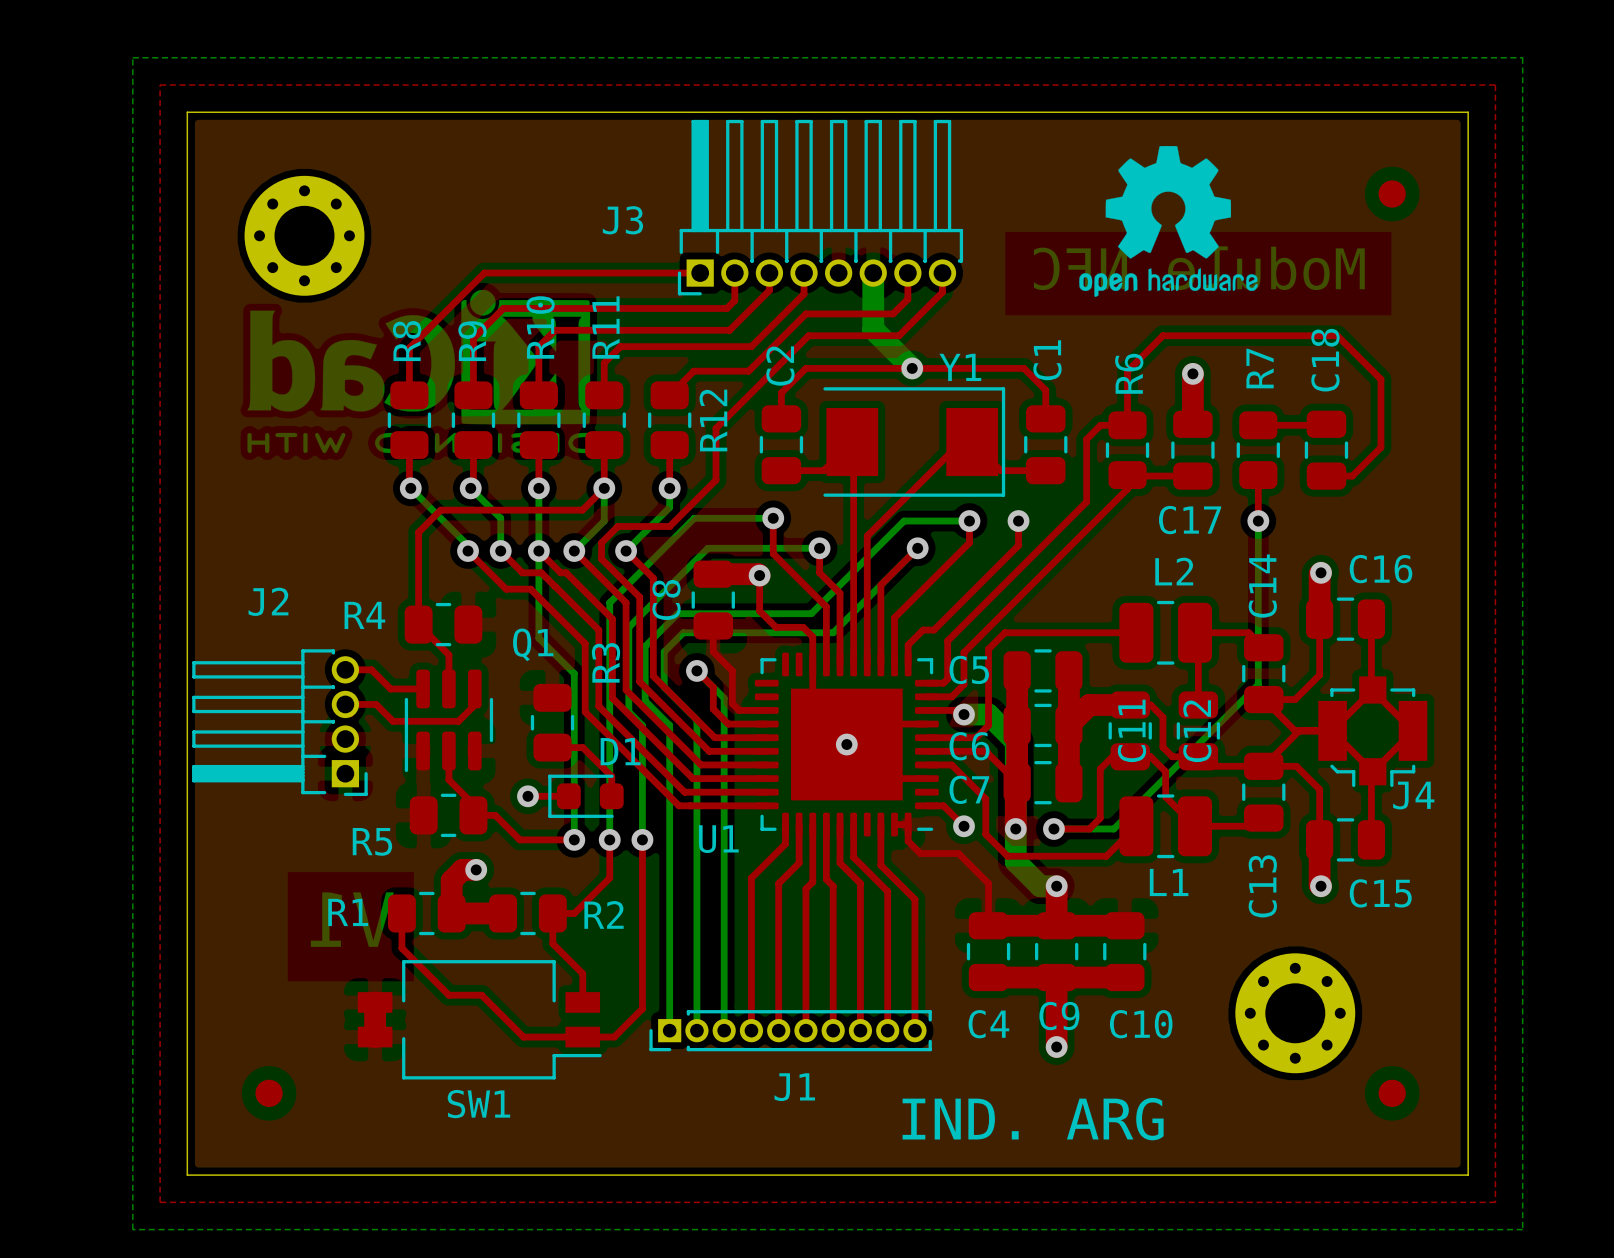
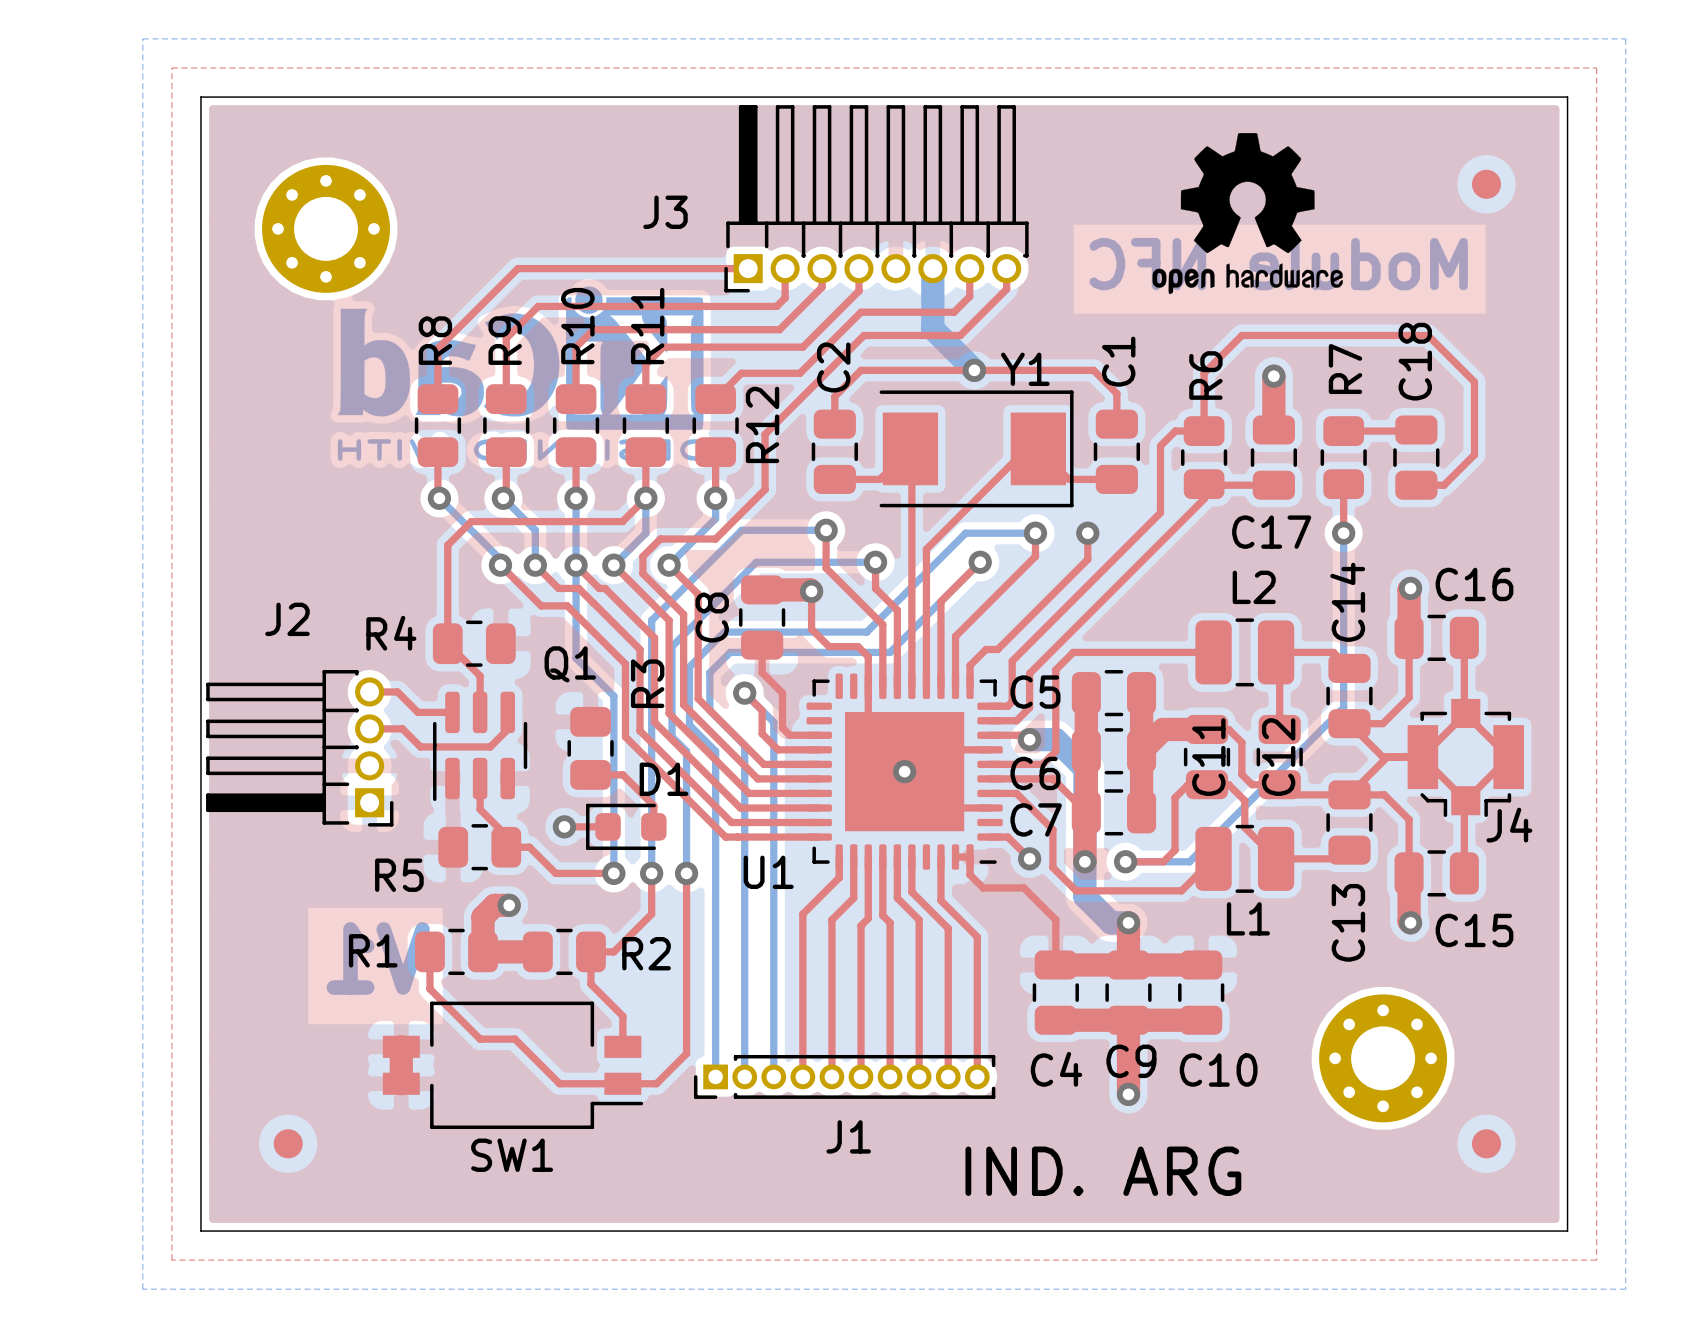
drawing position: (418, 371) -> (520, 373)

